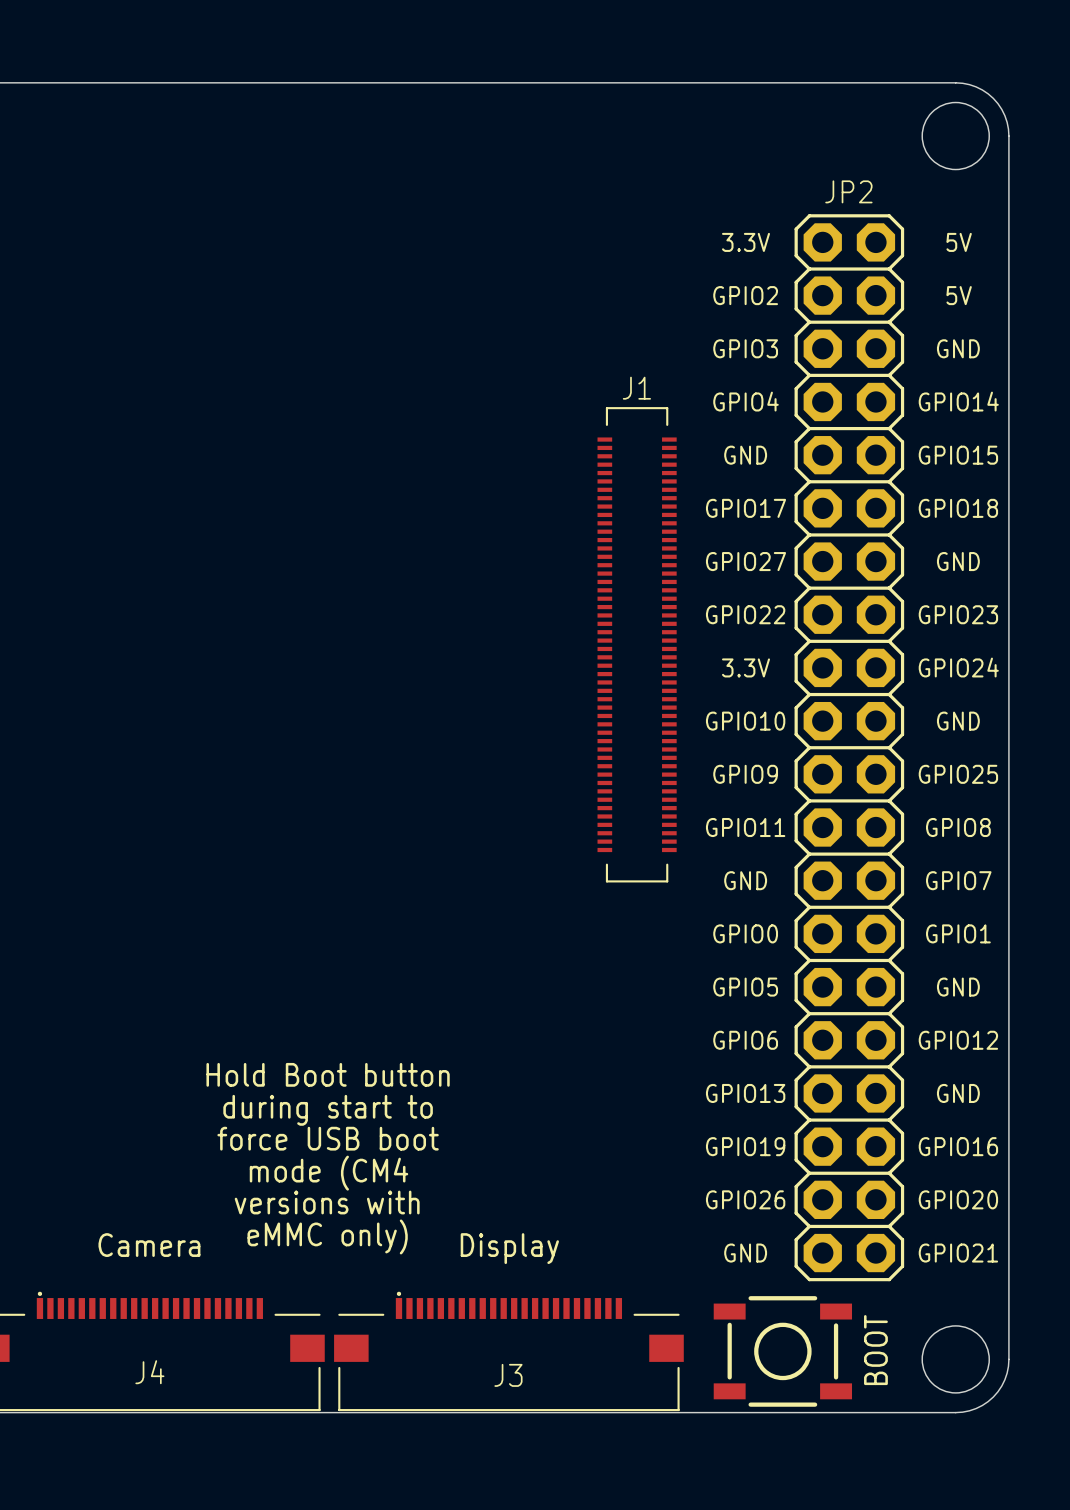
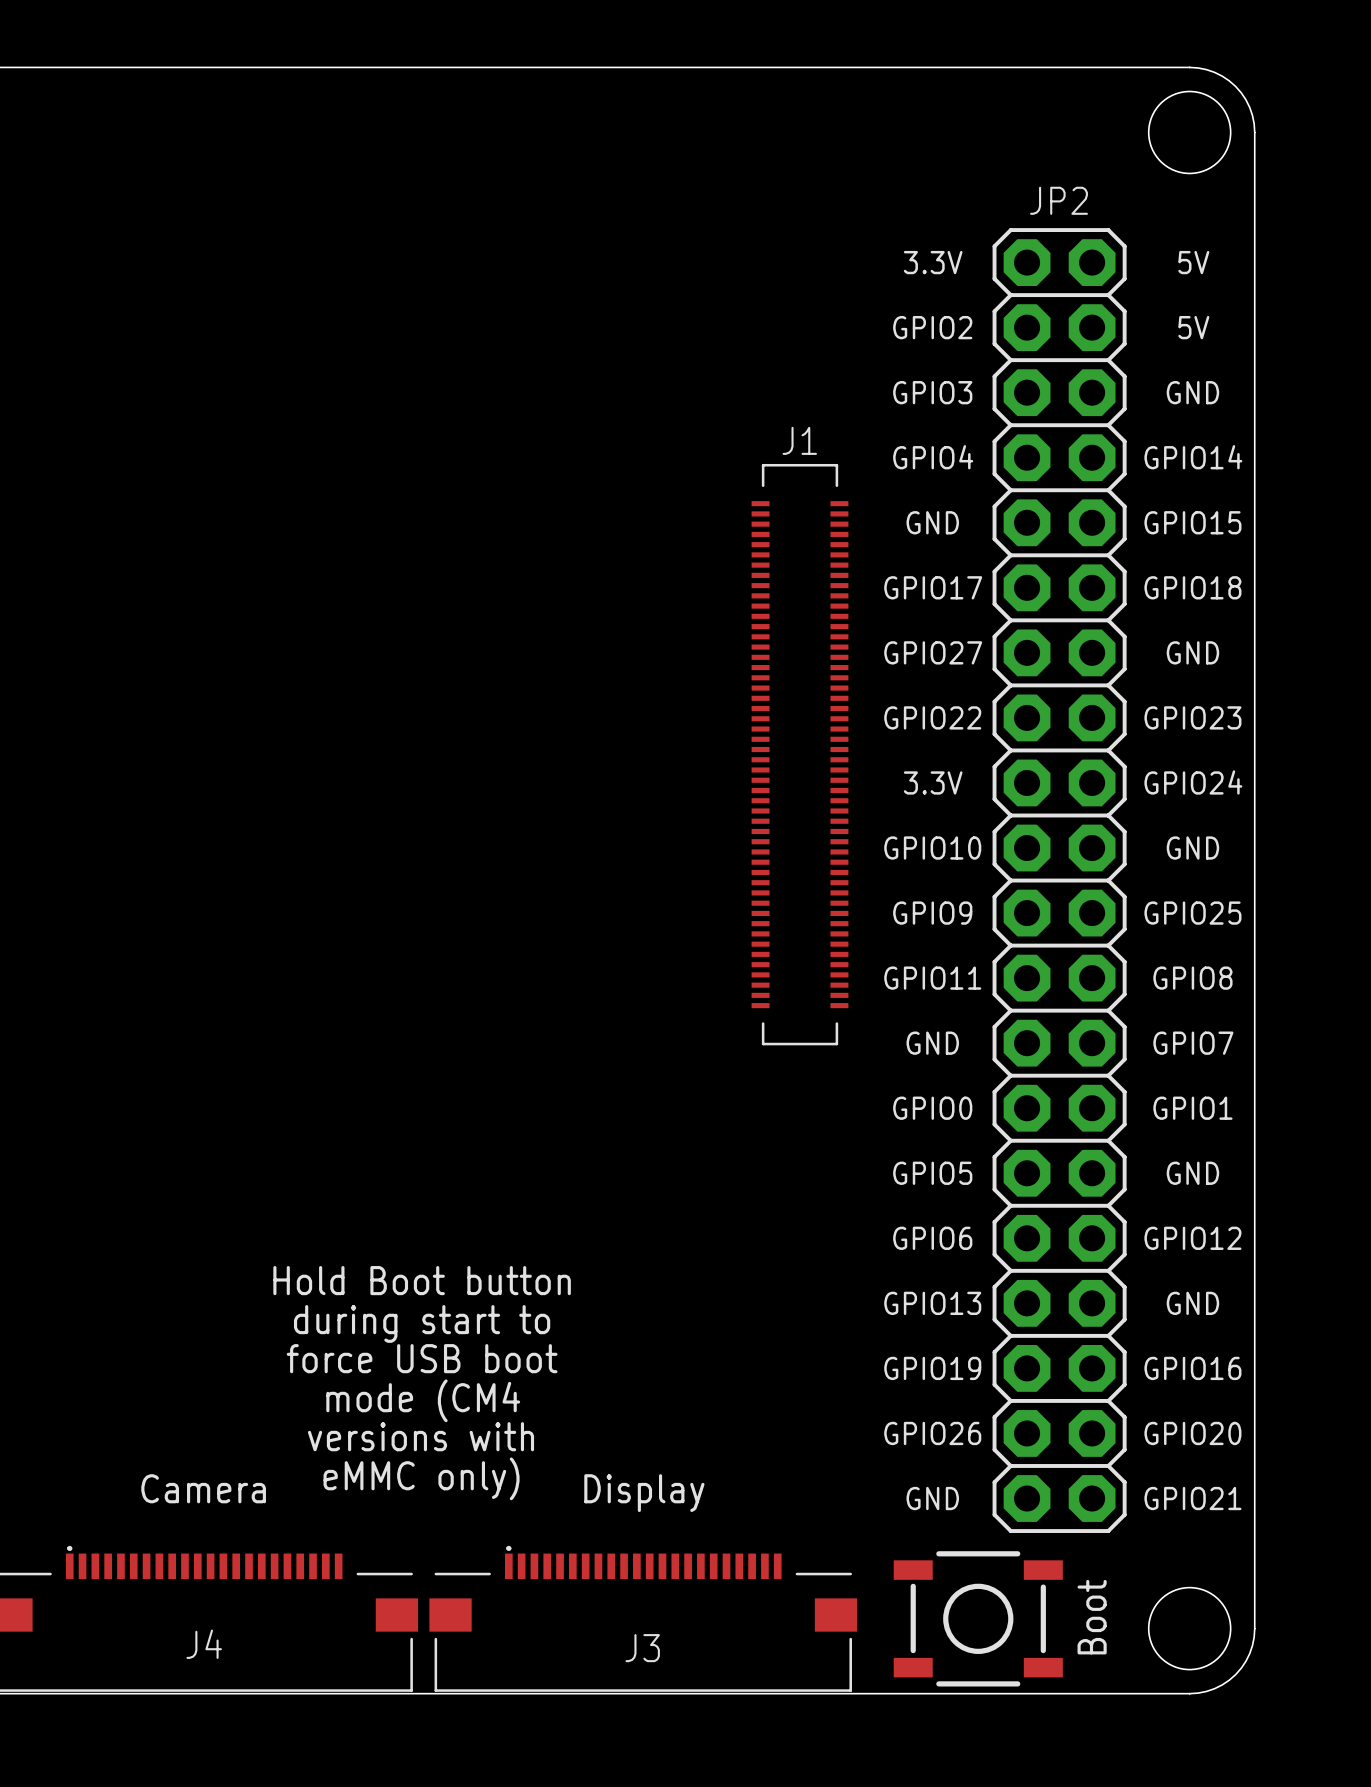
text: BOOT (875, 1350) -> Boot (1092, 1617)

